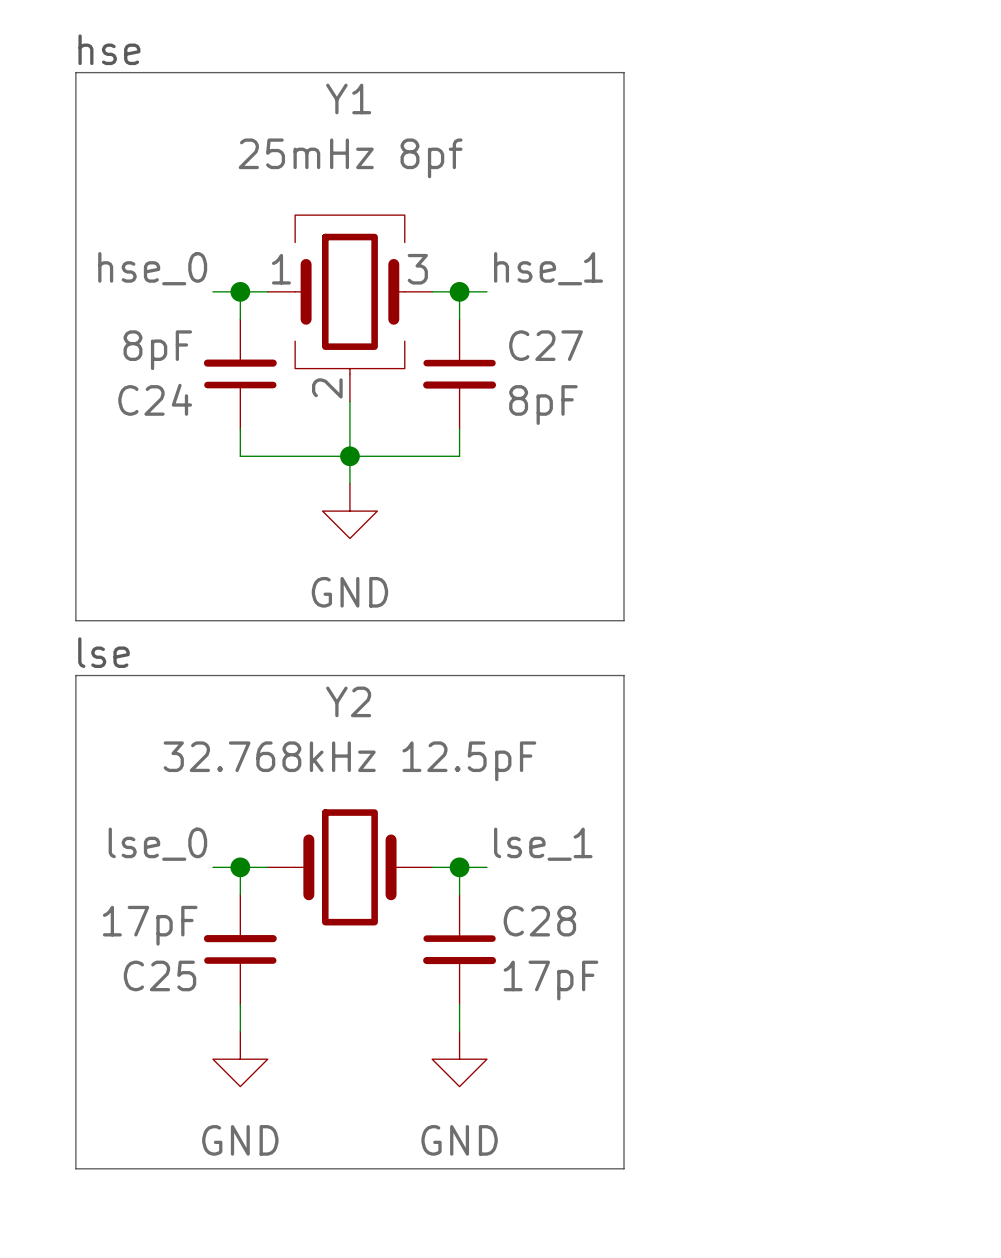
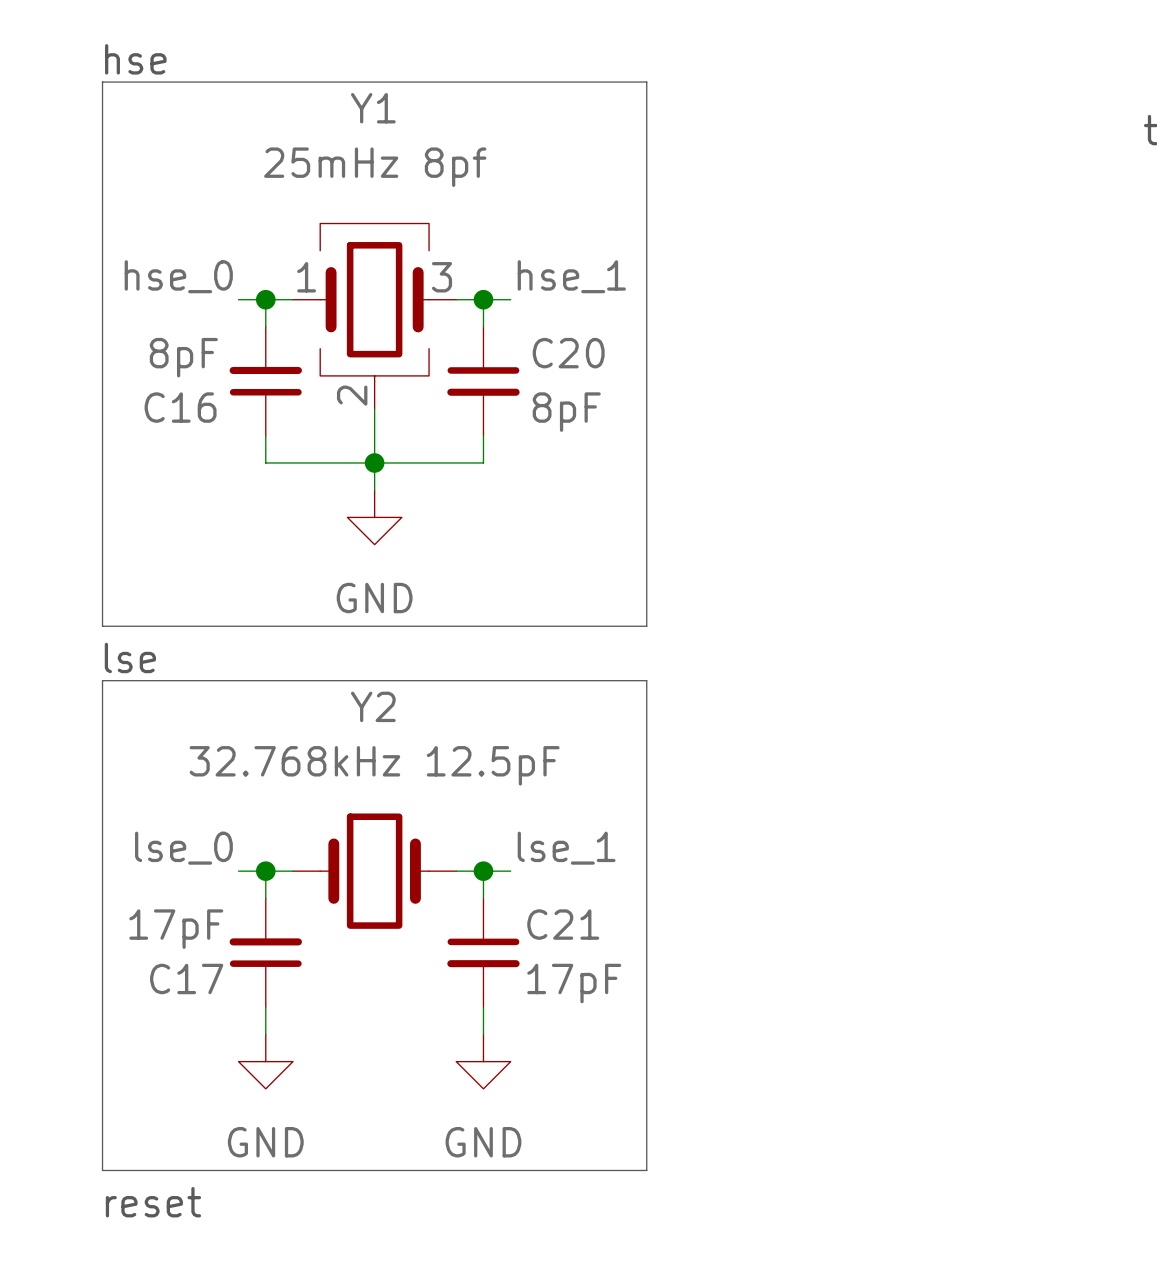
C27 name: C27 (546, 345) -> C20 (568, 353)
C24 name: C24 (155, 399) -> C16 (180, 407)
C28 name: C28 (539, 921) -> C21 (563, 924)
C25 name: C25 (159, 975) -> C17 (186, 978)
text: none -> reset (153, 1202)

